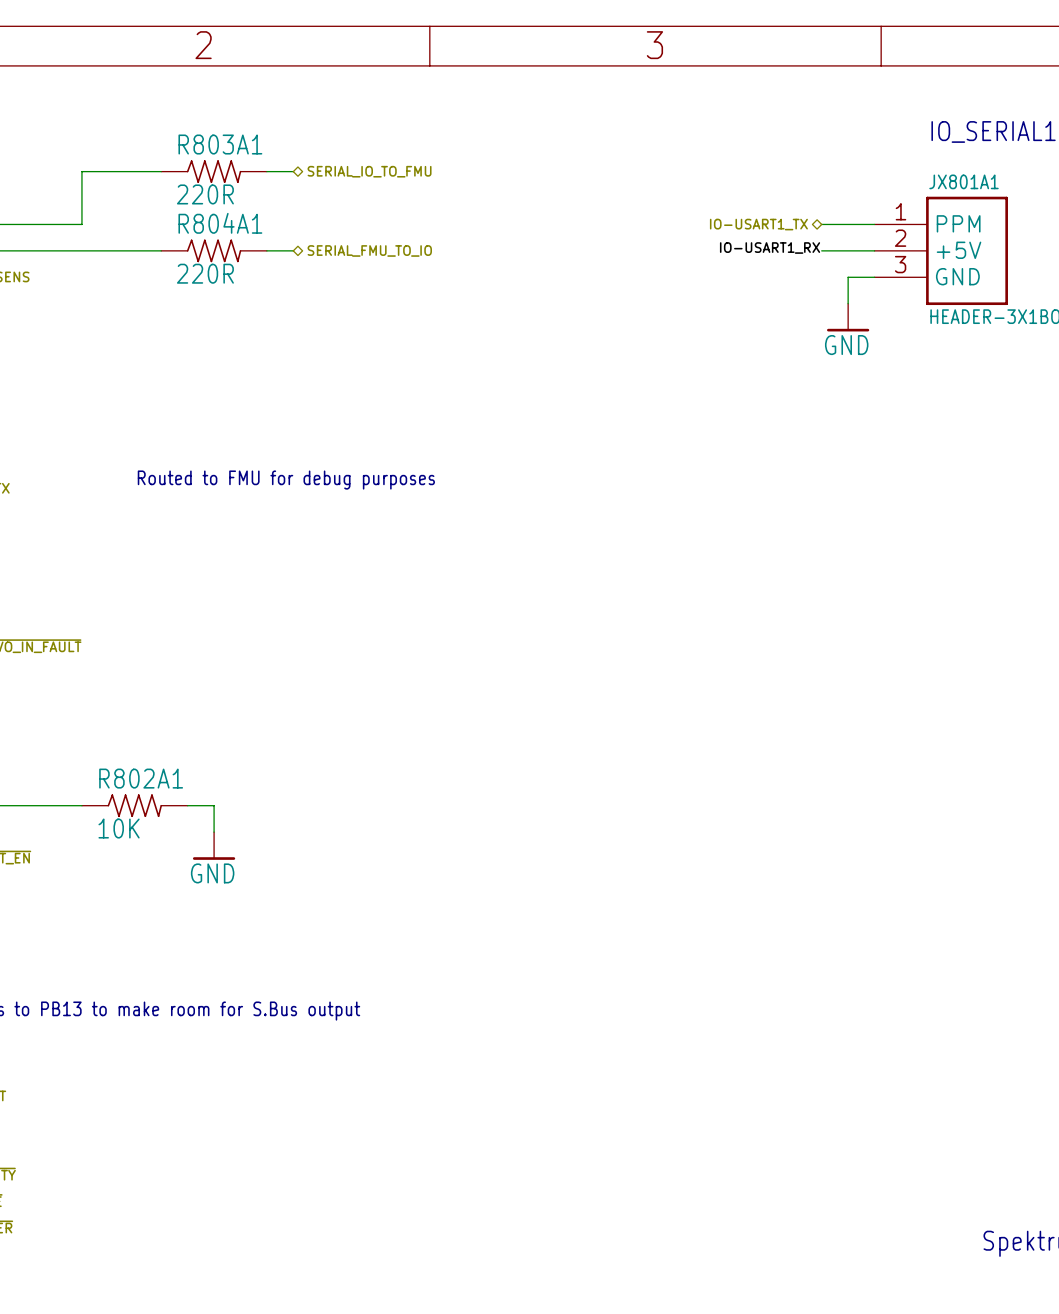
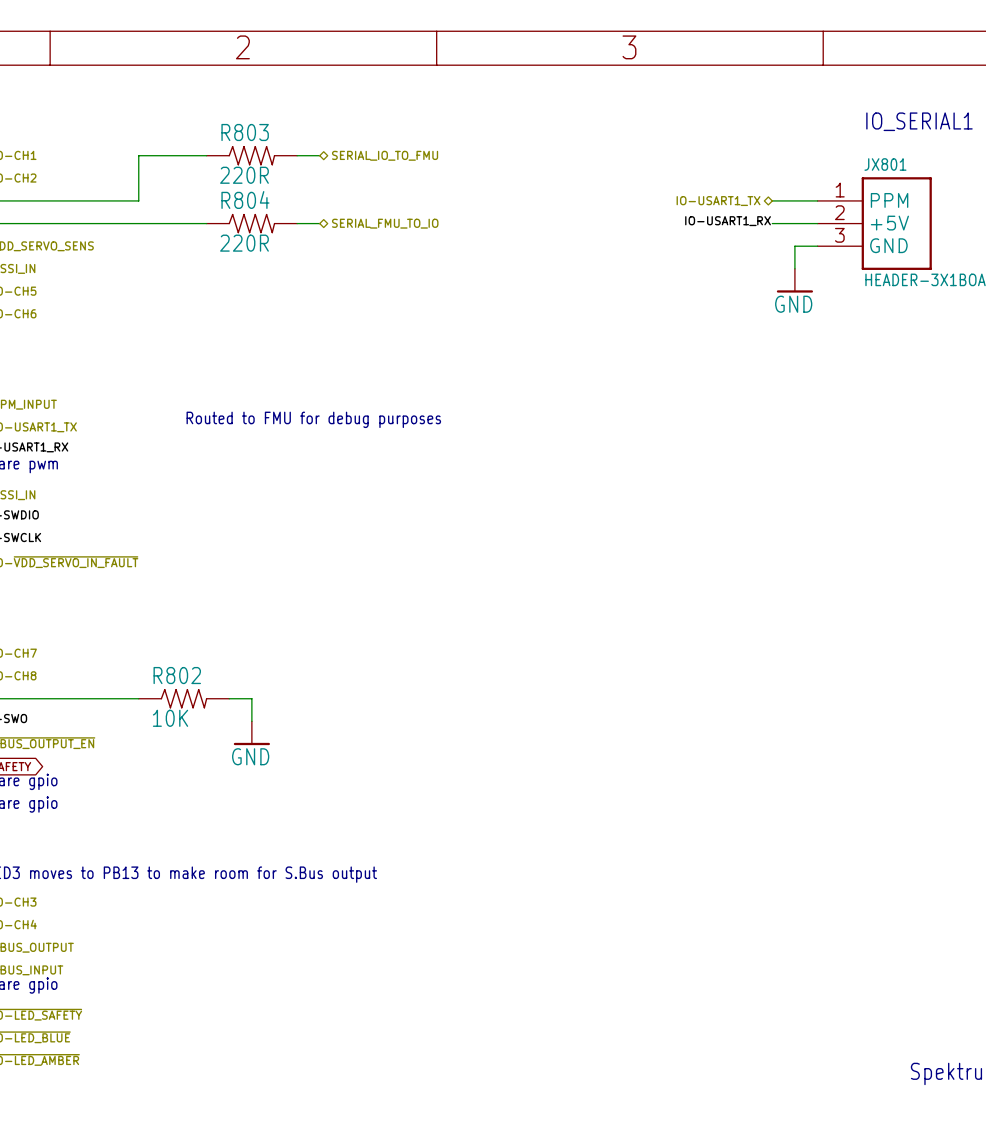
R803A1 name: R803A1 (220, 144) -> R803 (245, 132)
JX801A1 name: JX801A1 (963, 181) -> JX801 (885, 164)
R804A1 name: R804A1 (220, 223) -> R804 (245, 199)
R802A1 name: R802A1 (141, 778) -> R802 (177, 675)

